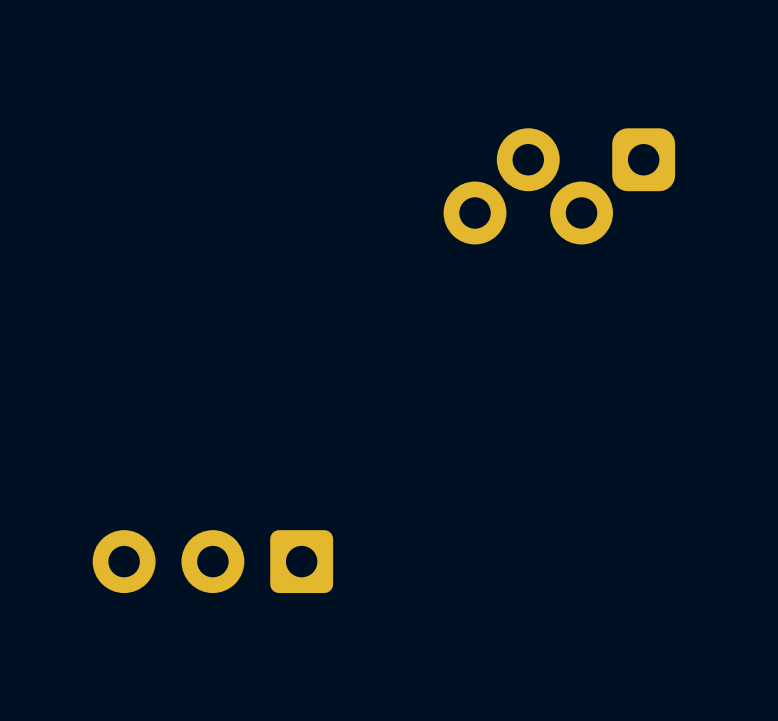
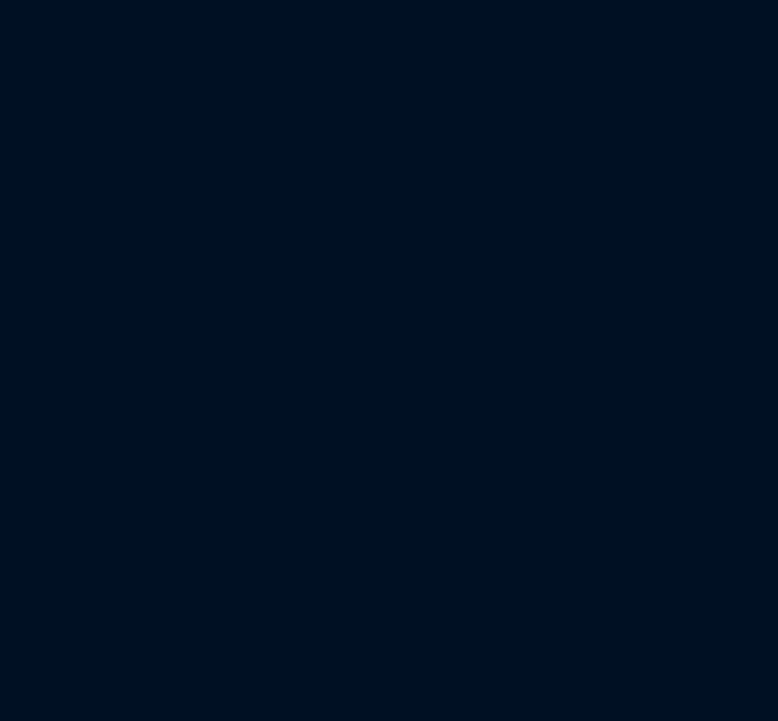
part: (559, 186) -> none
part: (212, 561) -> none

